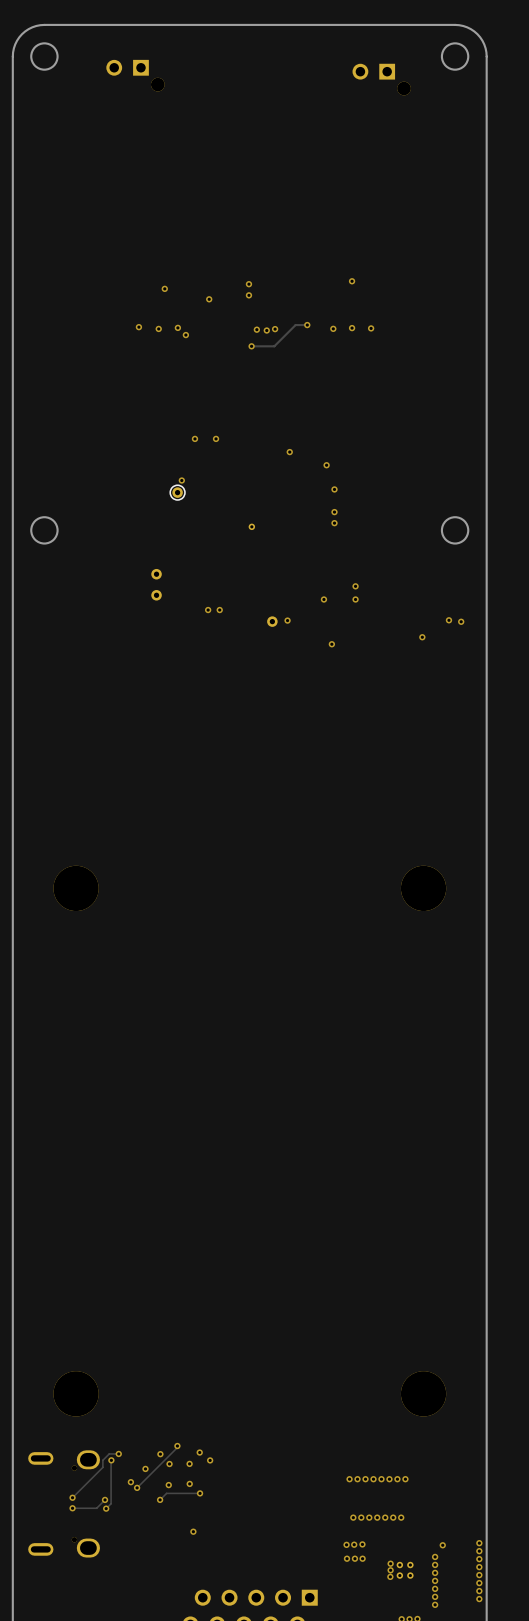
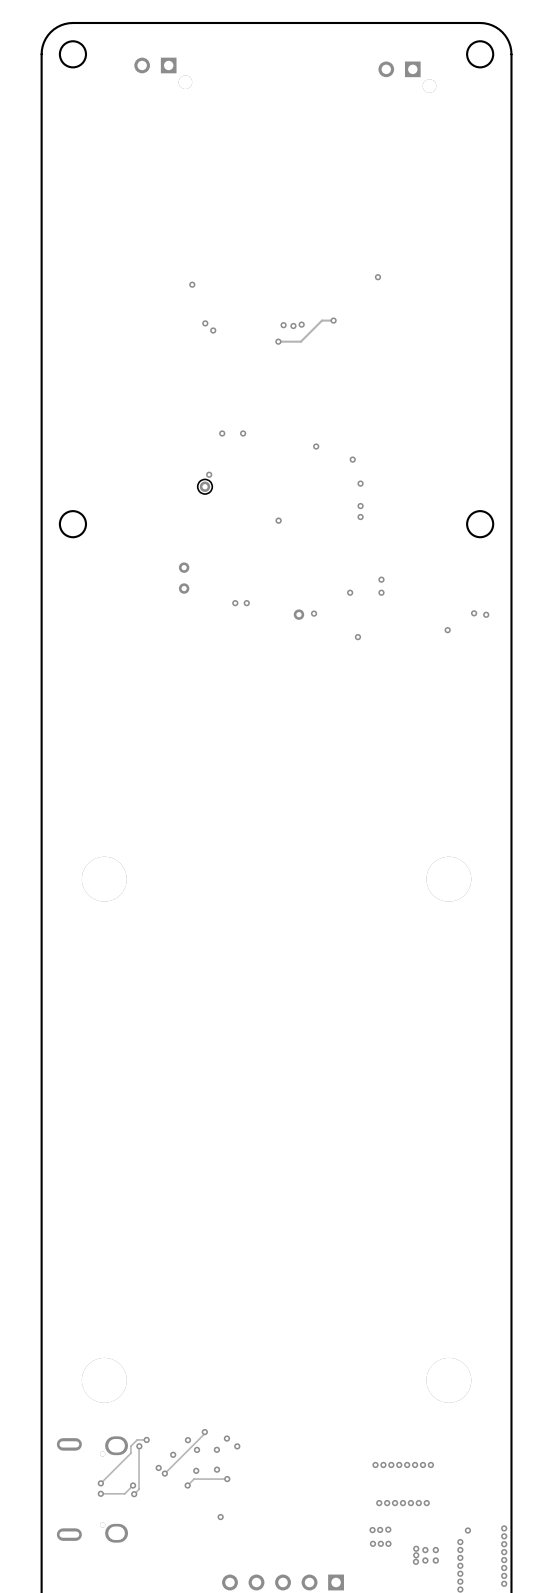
via: (248, 284) -> none
via: (248, 295) -> none
via: (209, 299) -> none
via: (138, 327) -> none
via: (158, 328) -> none
via: (333, 328) -> none
via: (352, 328) -> none
via: (371, 328) -> none

